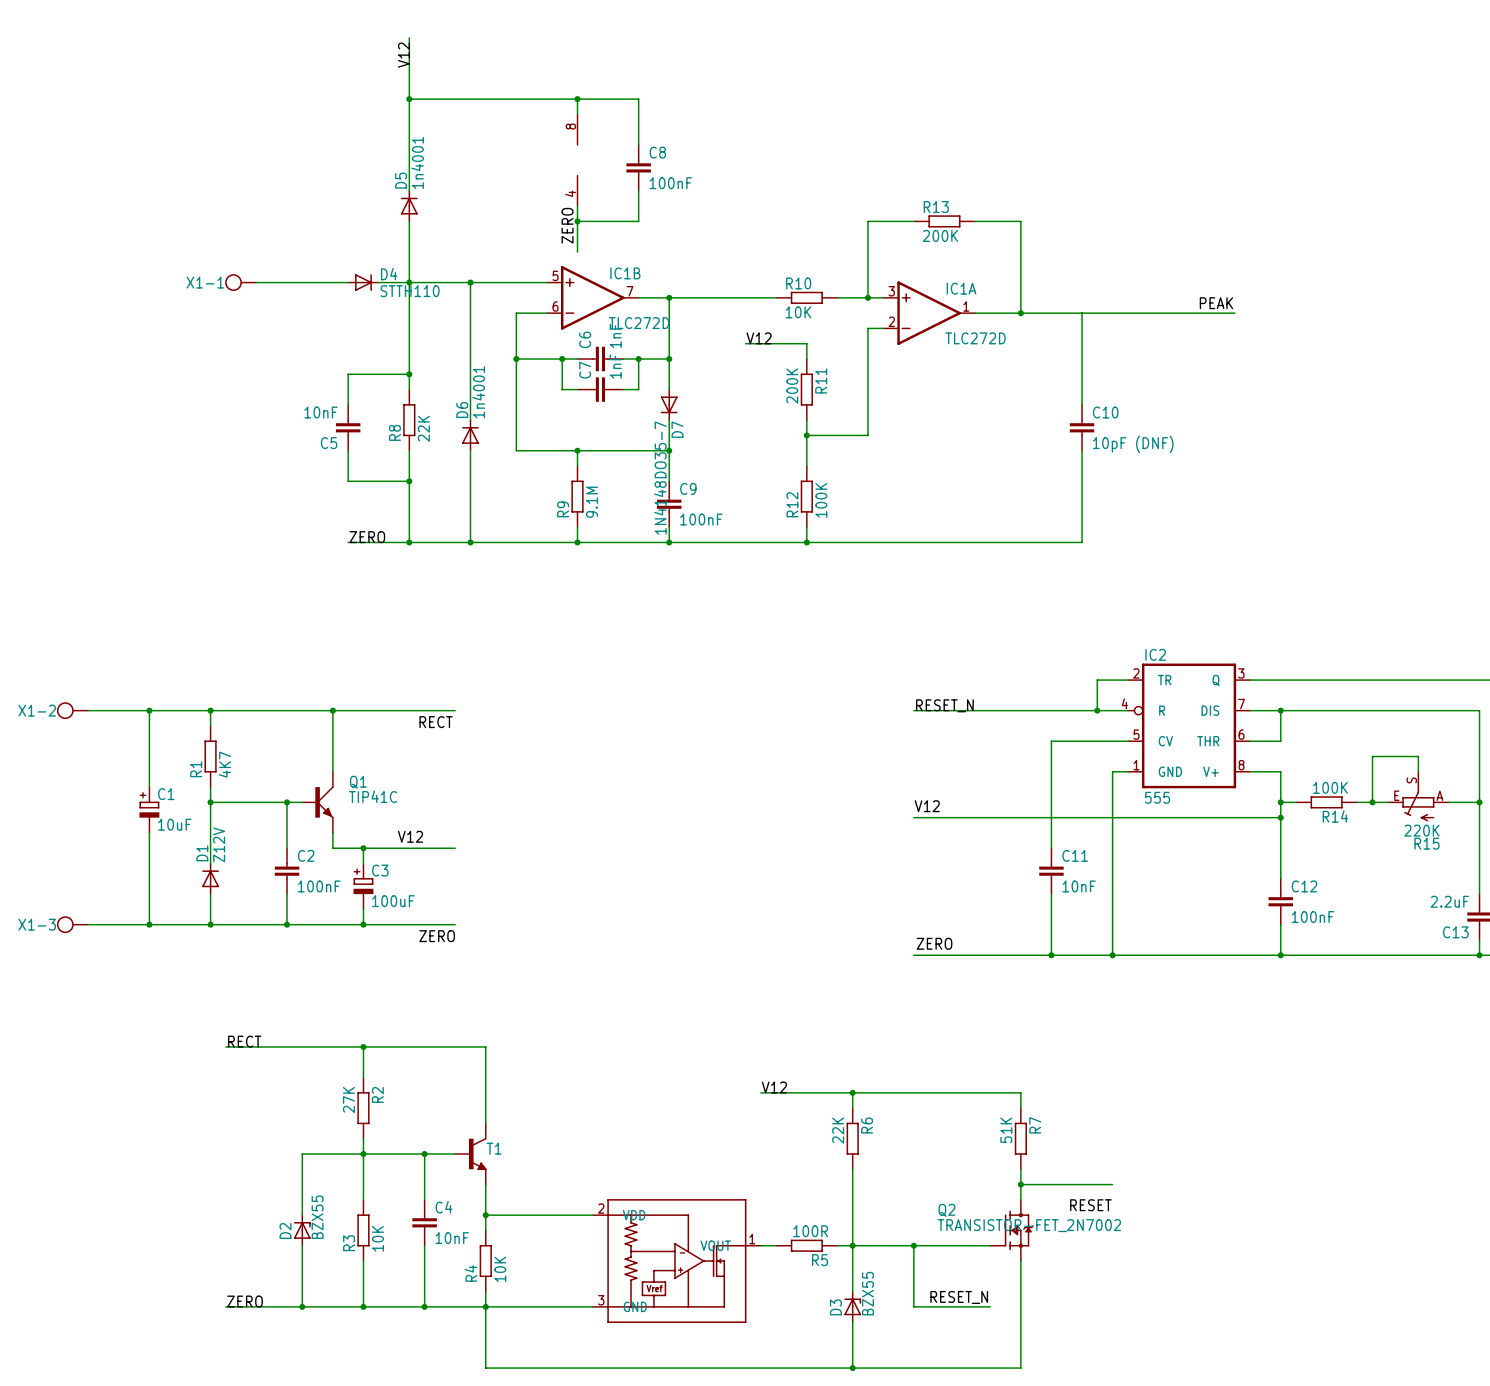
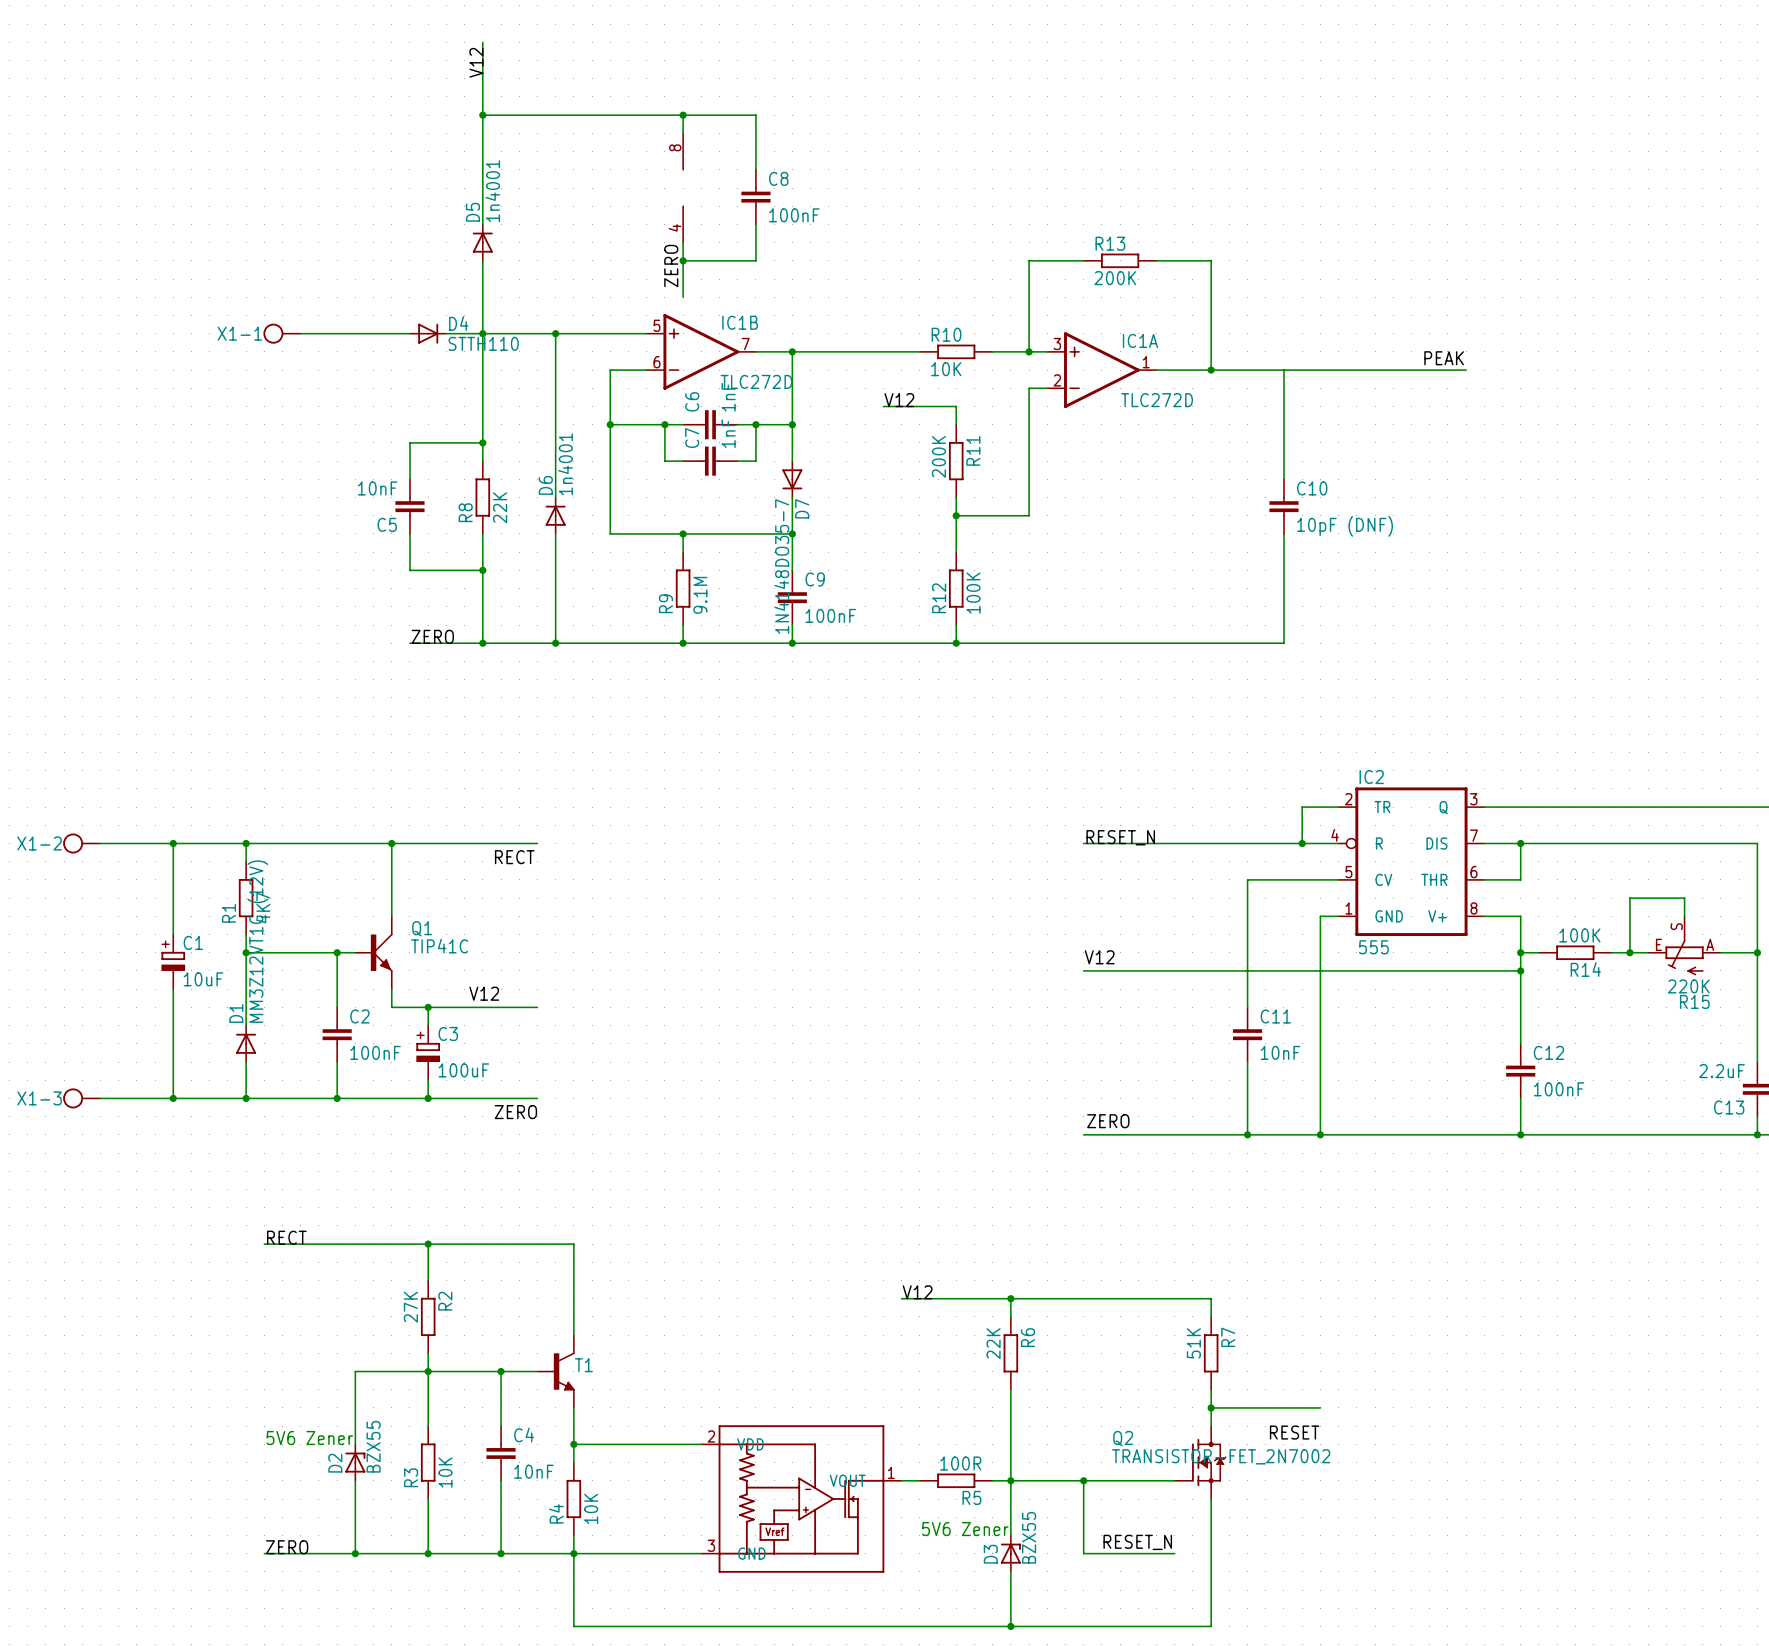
D1 value: Z12V (219, 844) -> MM3Z12VT1G (12V) (257, 941)
text: none -> 5V6 Zener (309, 1438)
text: none -> 5V6 Zener (965, 1529)

